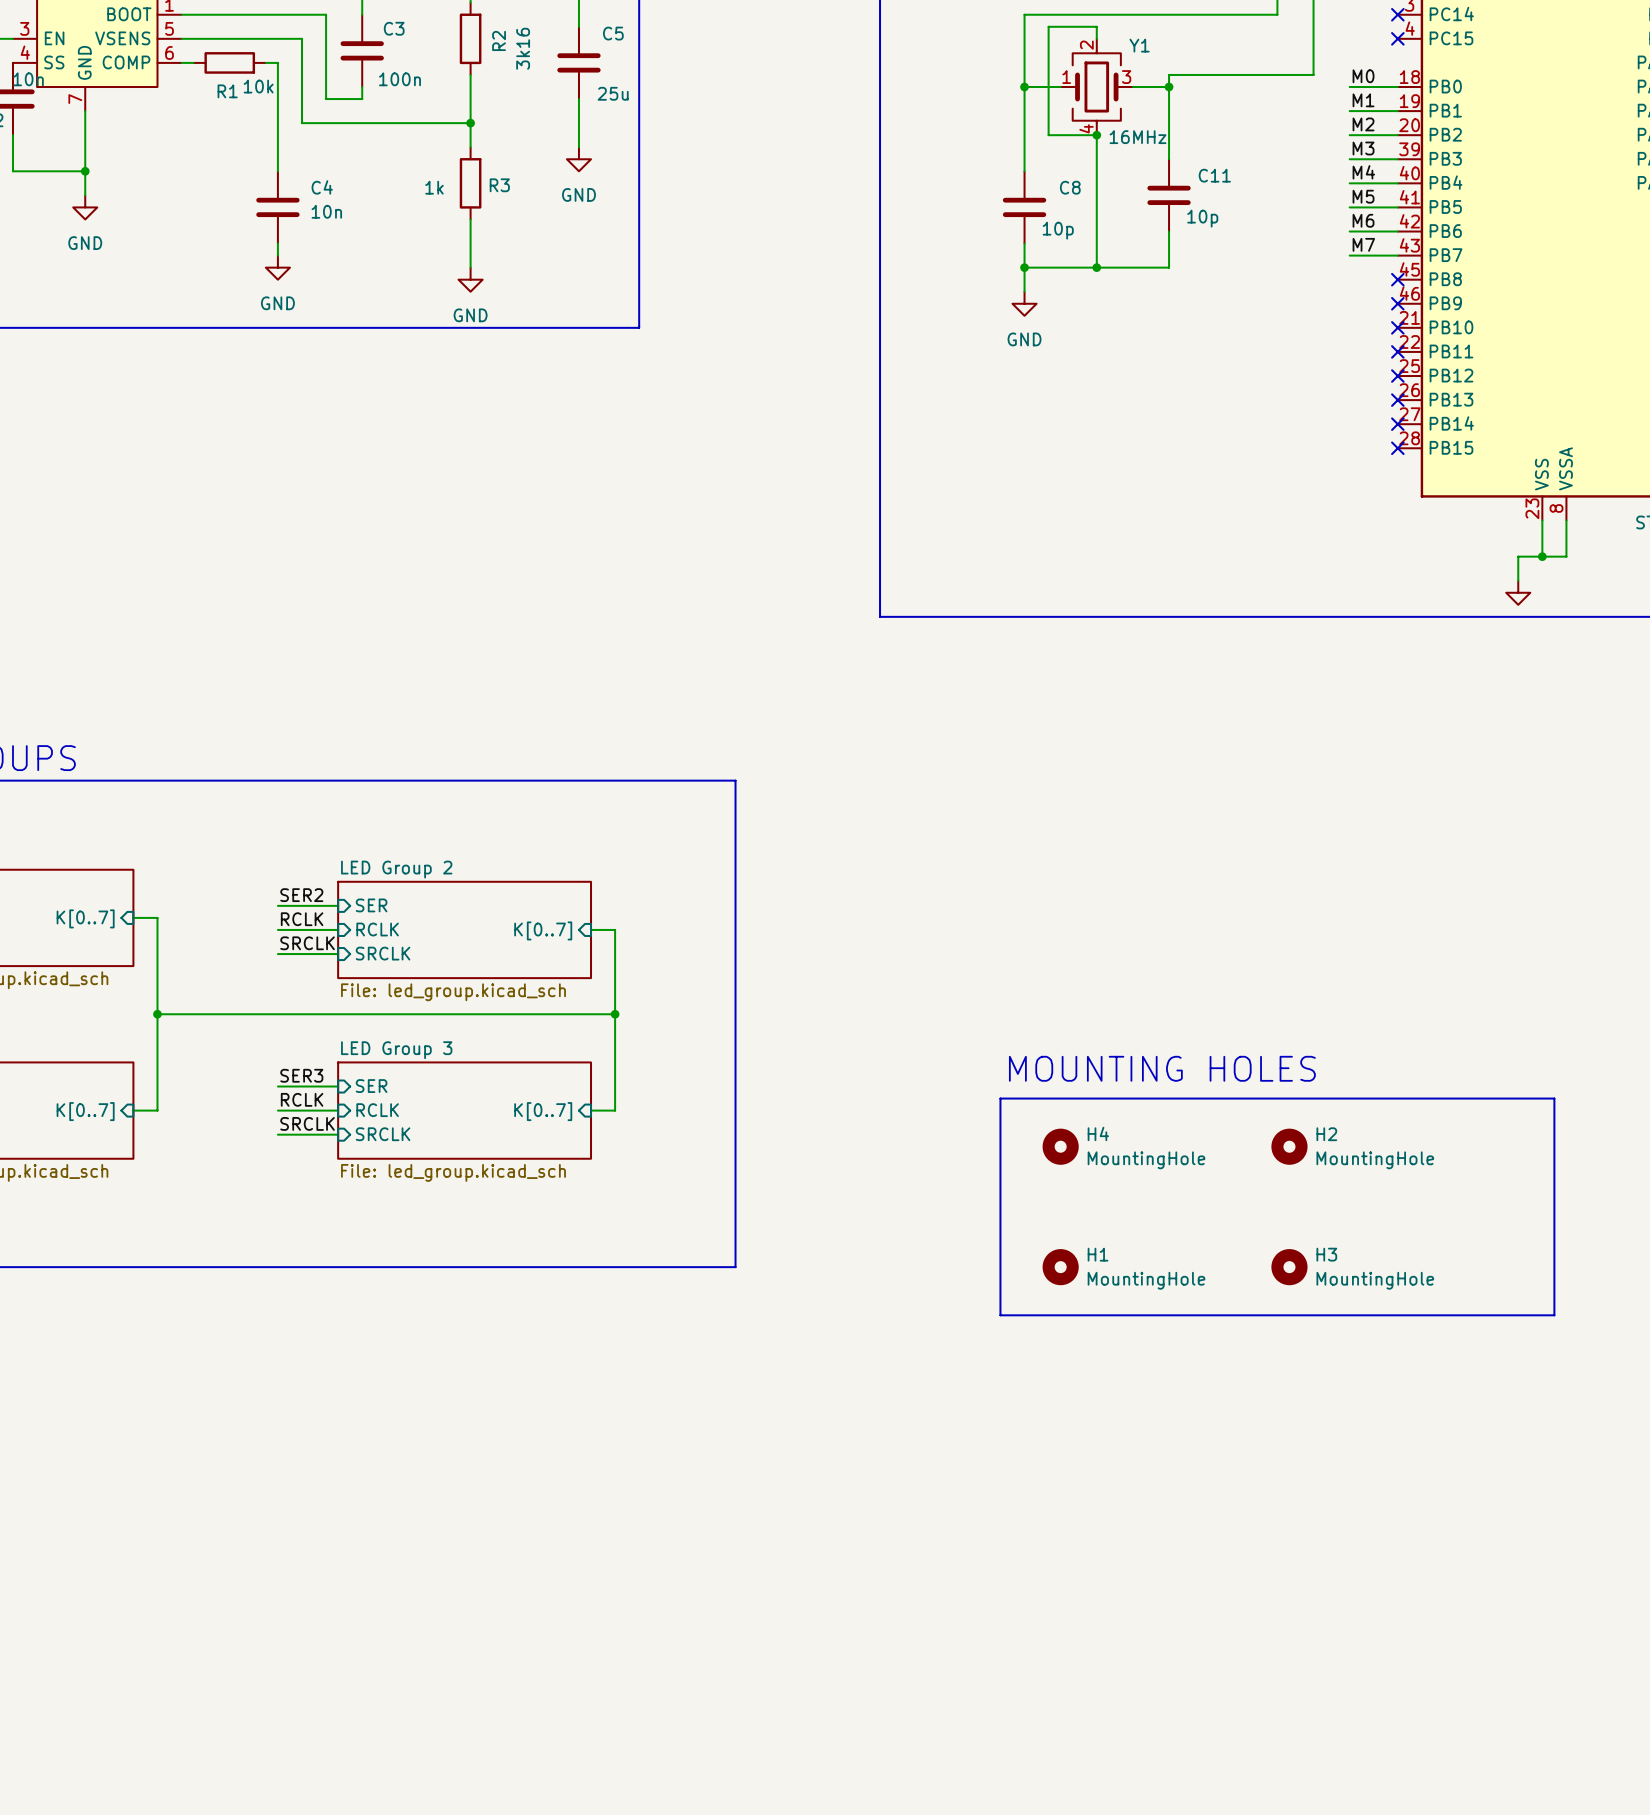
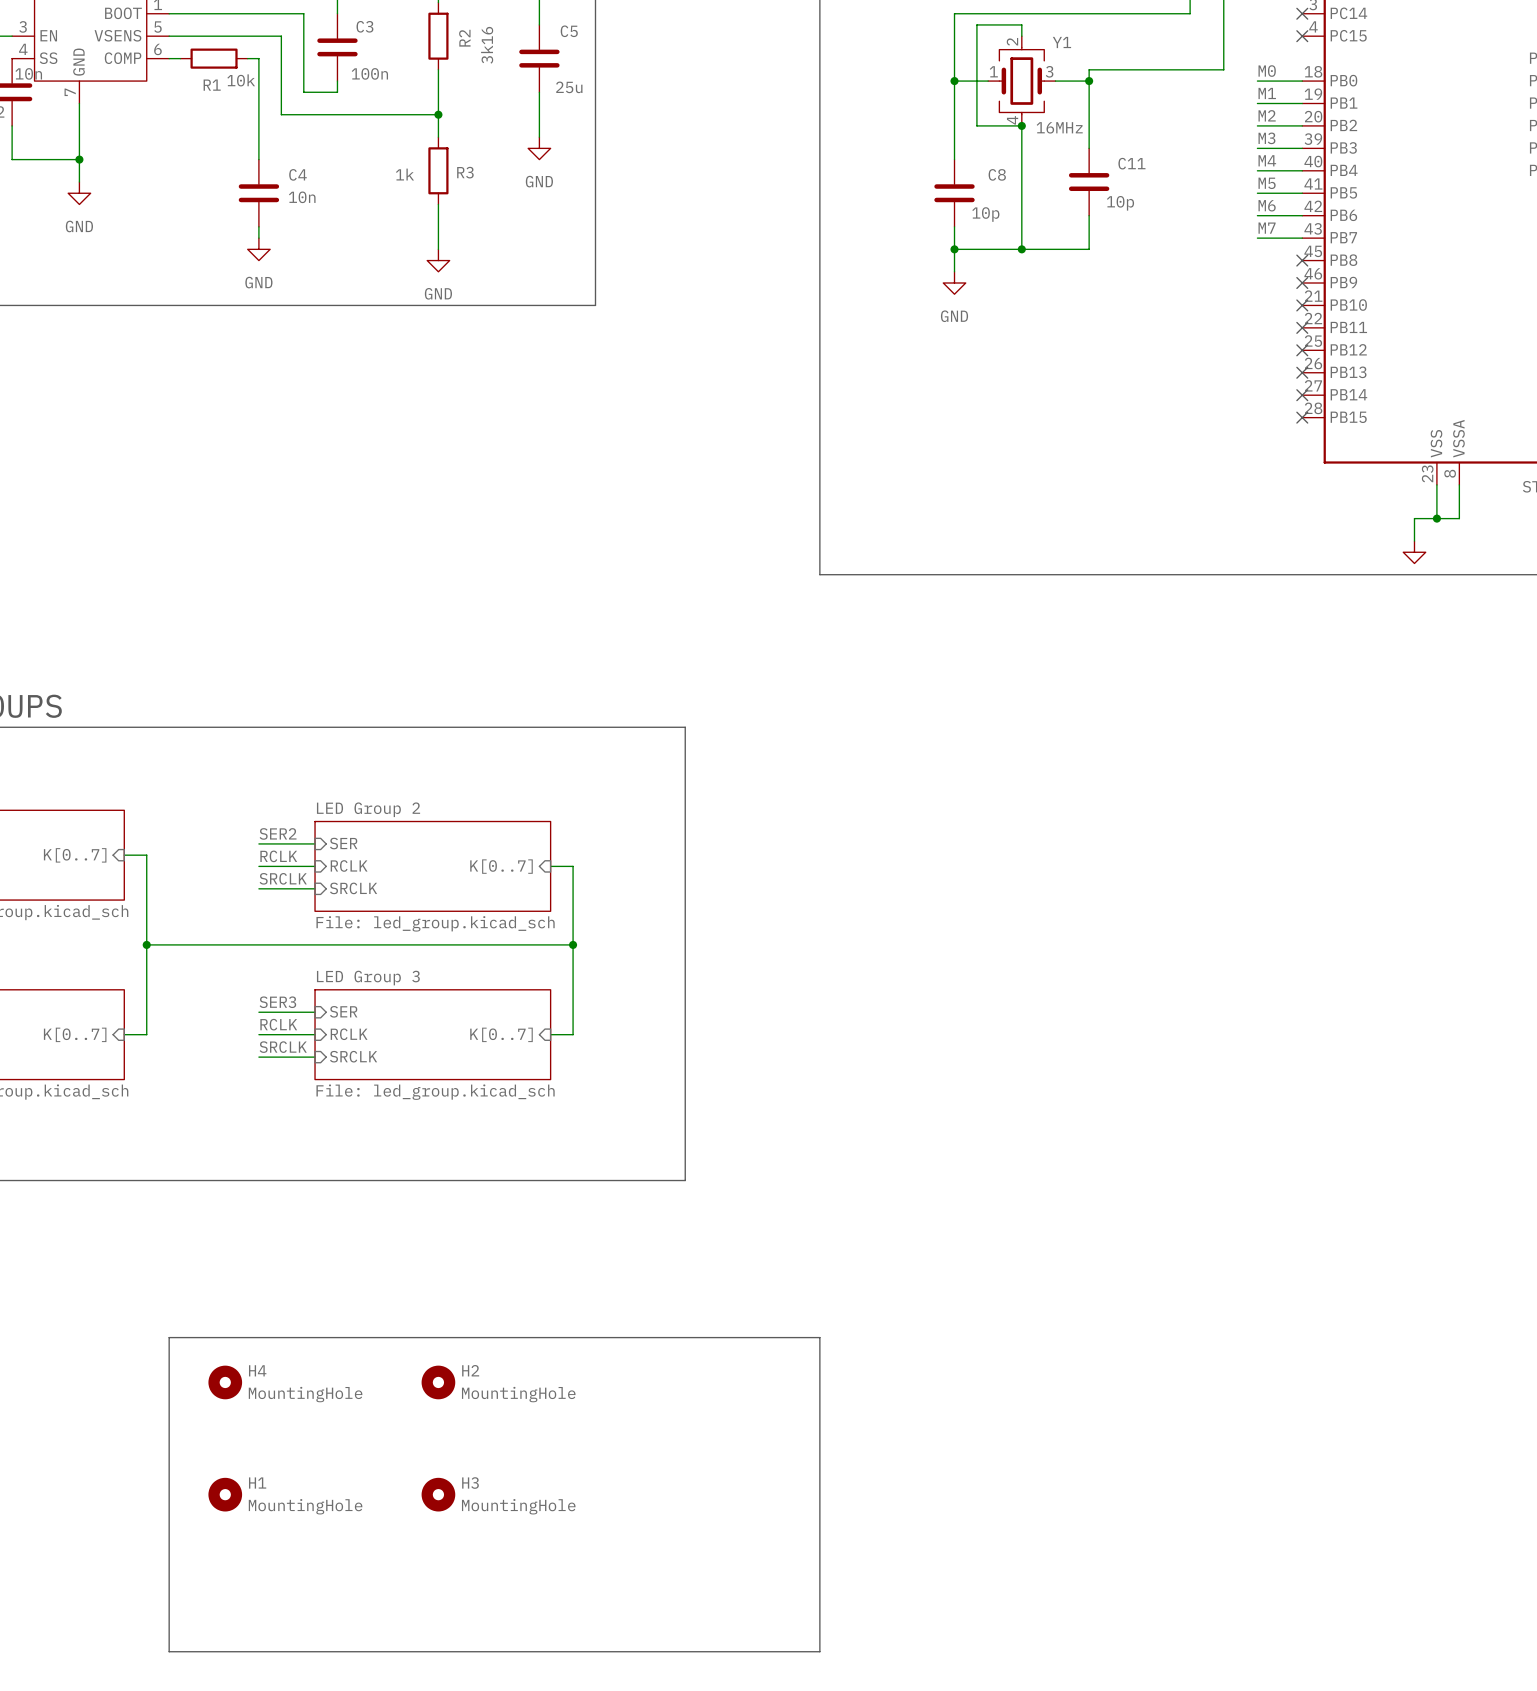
text: MOUNTING HOLES (1162, 1068) -> none
line: (1000, 1098) (1554, 1098) (1554, 1315) (1000, 1315) (1000, 1098) -> none
H4 position: (1060, 1146) -> (225, 1382)
H2 position: (1289, 1146) -> (438, 1382)
H1 position: (1060, 1267) -> (225, 1494)
H3 position: (1289, 1267) -> (438, 1494)
line: none -> (169, 1337) (819, 1337) (819, 1651) (169, 1651) (169, 1337)

